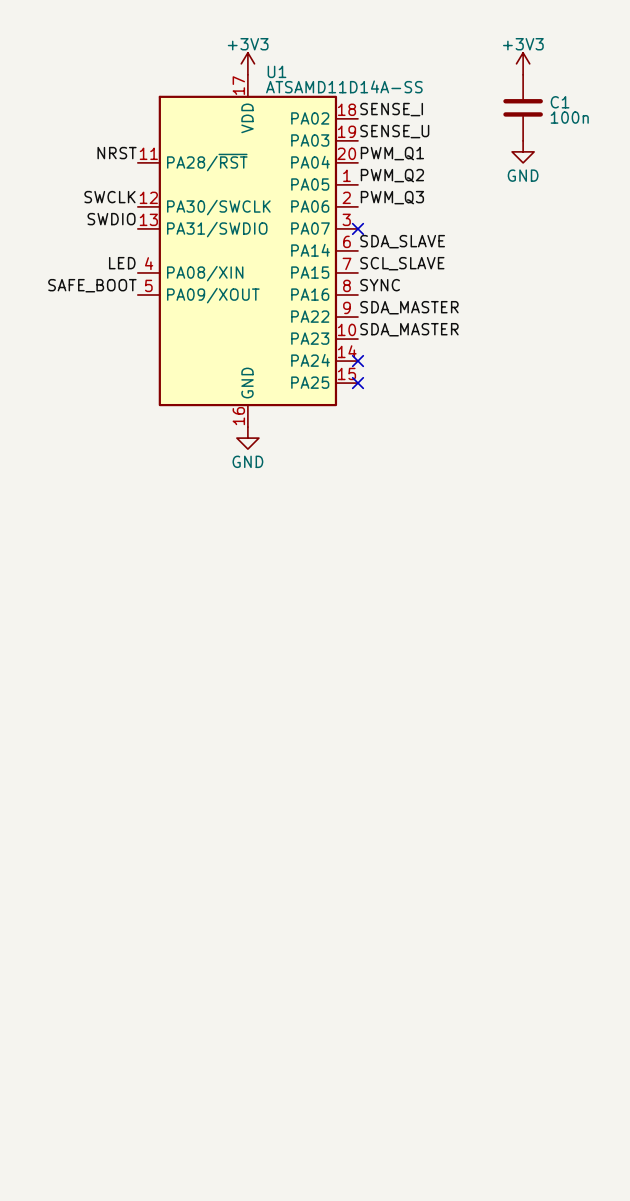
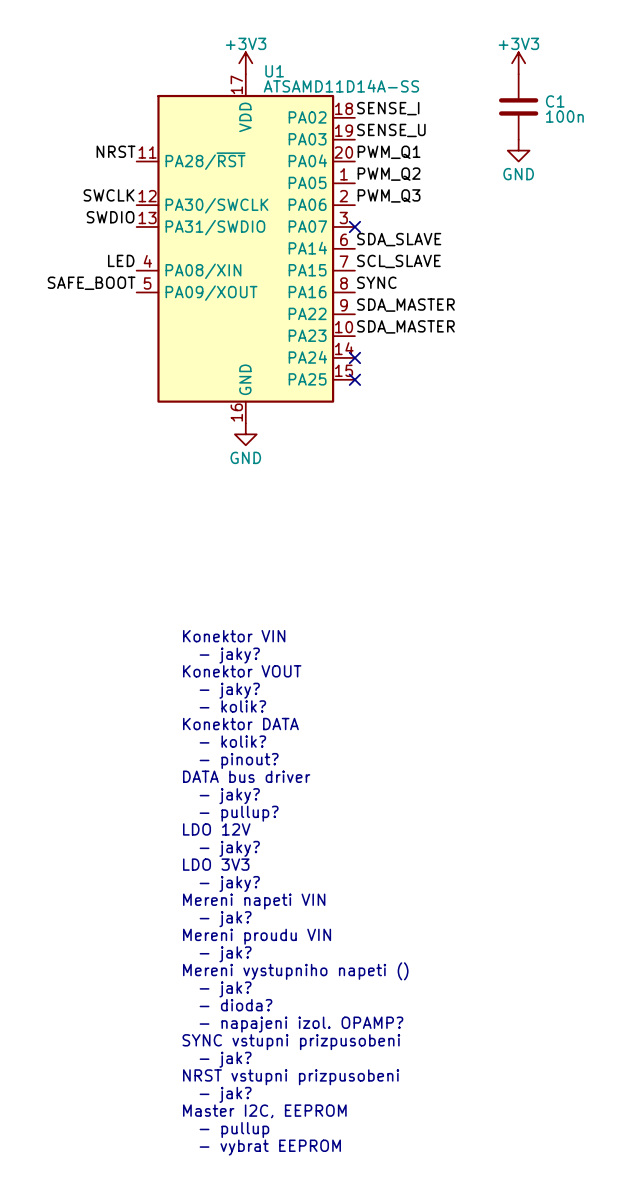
text: none -> Konektor VIN (234, 636)
text: none -> - jaky? (229, 655)
text: none -> Konektor VOUT (242, 671)
text: none -> - jaky? (229, 690)
text: none -> - kolik? (232, 706)
text: none -> Konektor DATA (240, 724)
text: none -> - kolik? (232, 741)
text: none -> - pinout? (239, 760)
text: none -> DATA bus driver (246, 776)
text: none -> - jaky? (229, 796)
text: none -> - pullup? (239, 813)
text: none -> LDO 12V (216, 829)
text: none -> - jaky? (229, 848)
text: none -> LDO 3V3 (216, 864)
text: none -> - jaky? (229, 883)
text: none -> Mereni napeti VIN (254, 901)
text: none -> - jak? (225, 919)
text: none -> Mereni proudu VIN (257, 936)
text: none -> - jak? (225, 954)
text: none -> Mereni vystupniho napeti () (295, 971)
text: none -> - jak? (225, 989)
text: none -> - dioda? (236, 1005)
text: none -> - napajeni izol. OPAMP? (301, 1024)
text: none -> SYNC vstupni prizpusobeni (291, 1042)
text: none -> - jak? (225, 1059)
text: none -> NRST vstupni prizpusobeni (291, 1077)
text: none -> - jak? (225, 1094)
text: none -> Master I2C, EEPROM (264, 1111)
text: none -> - pullup (234, 1129)
text: none -> - vybrat EEPROM (270, 1147)

